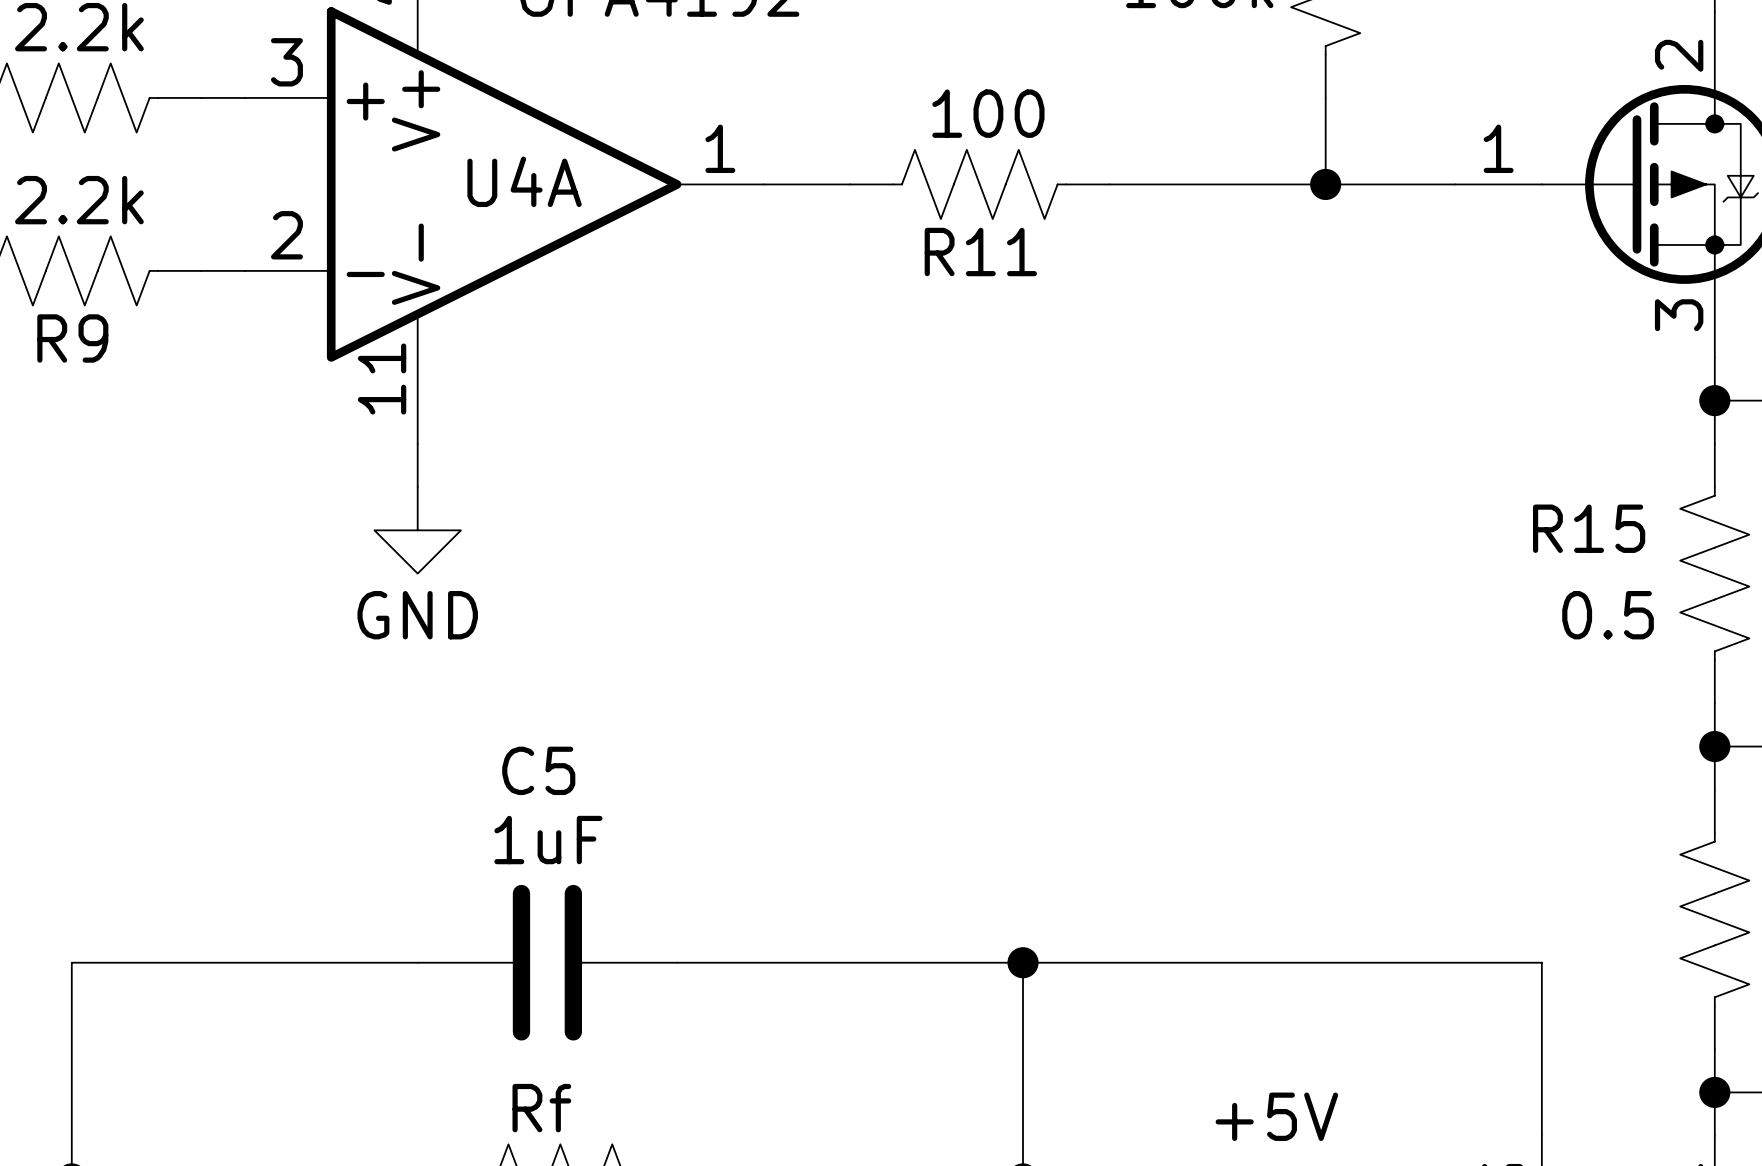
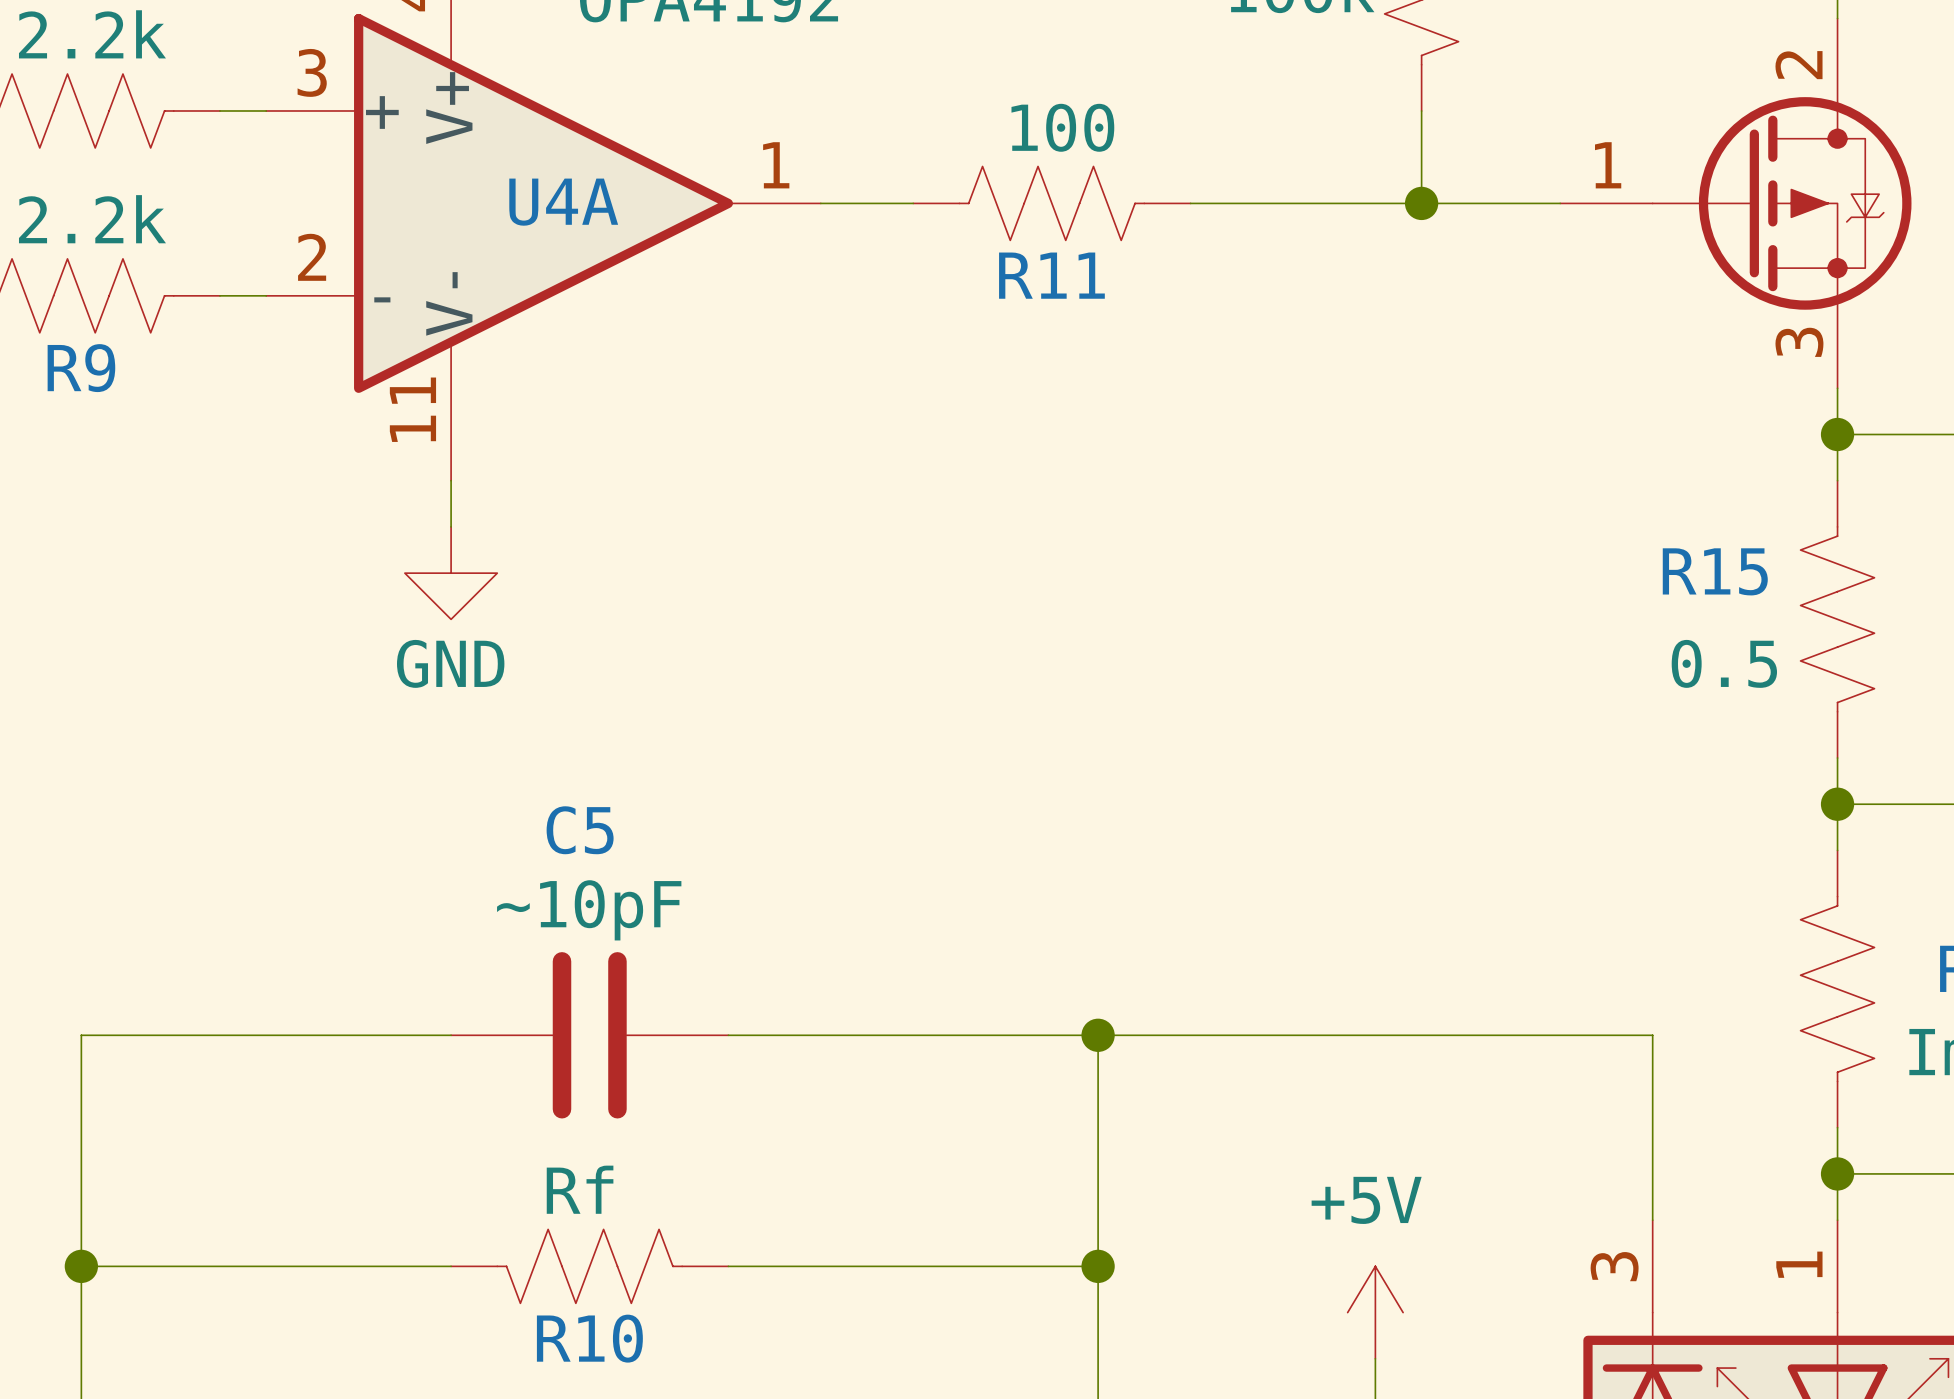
C5 value: 1uF (548, 840) -> ~10pF (589, 910)

